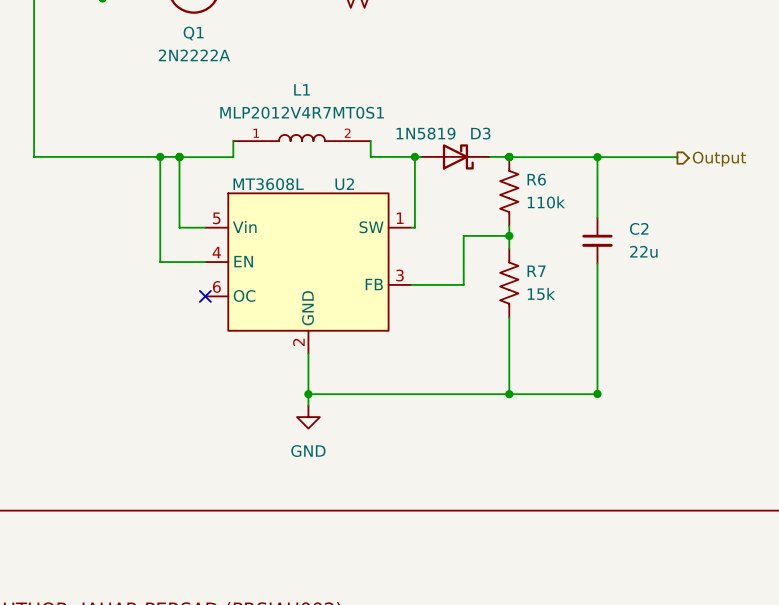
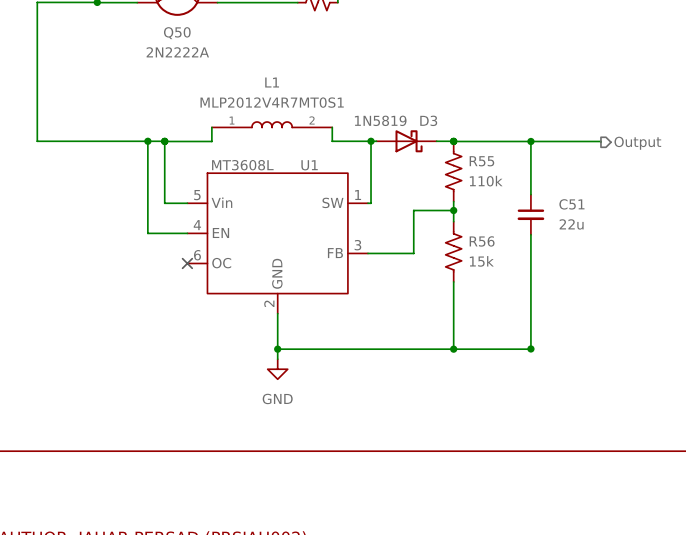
Q1 name: Q1 (193, 33) -> Q50 (177, 33)
R6 name: R6 (536, 179) -> R55 (481, 161)
U2 name: U2 (344, 184) -> U1 (309, 165)
C2 name: C2 (639, 228) -> C51 (571, 204)
R7 name: R7 (536, 271) -> R56 (482, 241)

